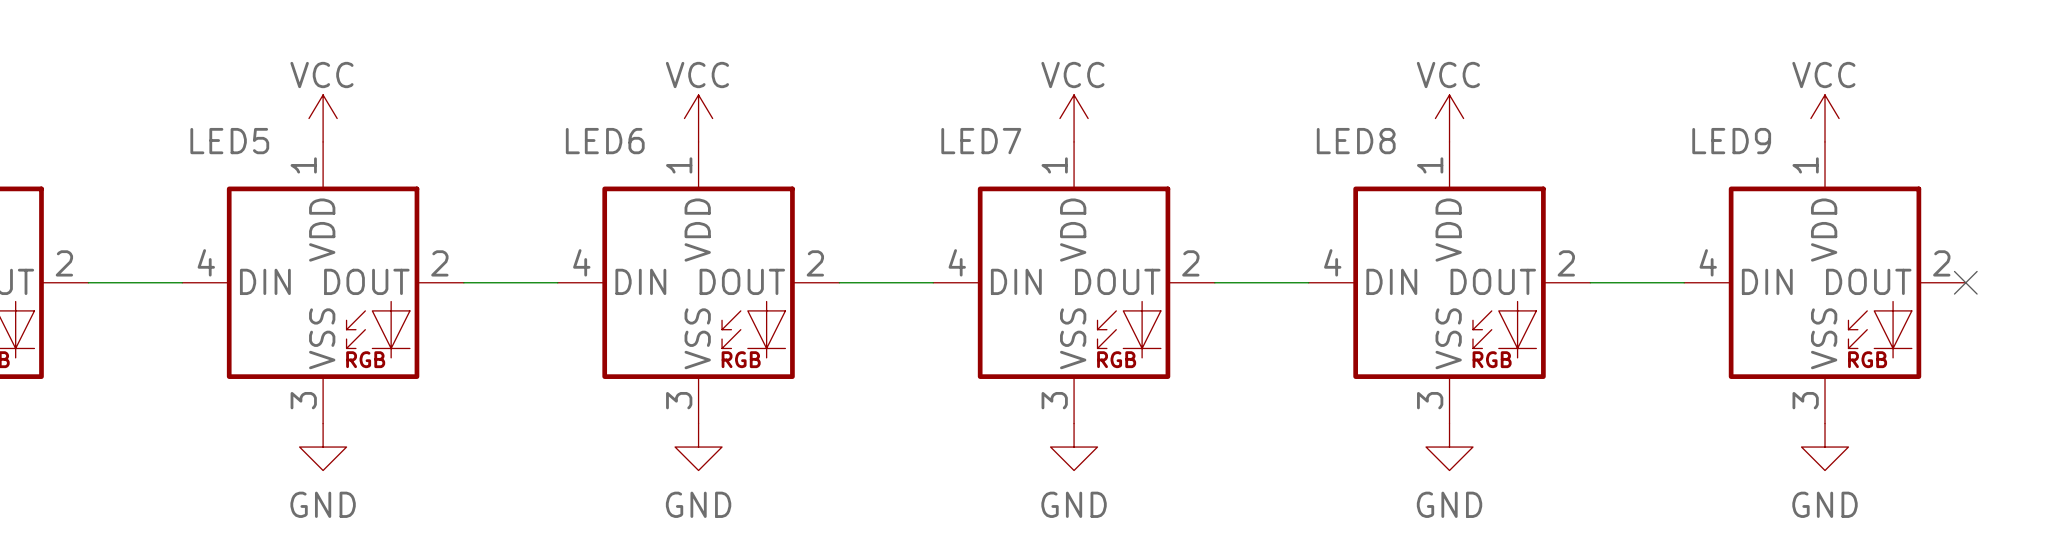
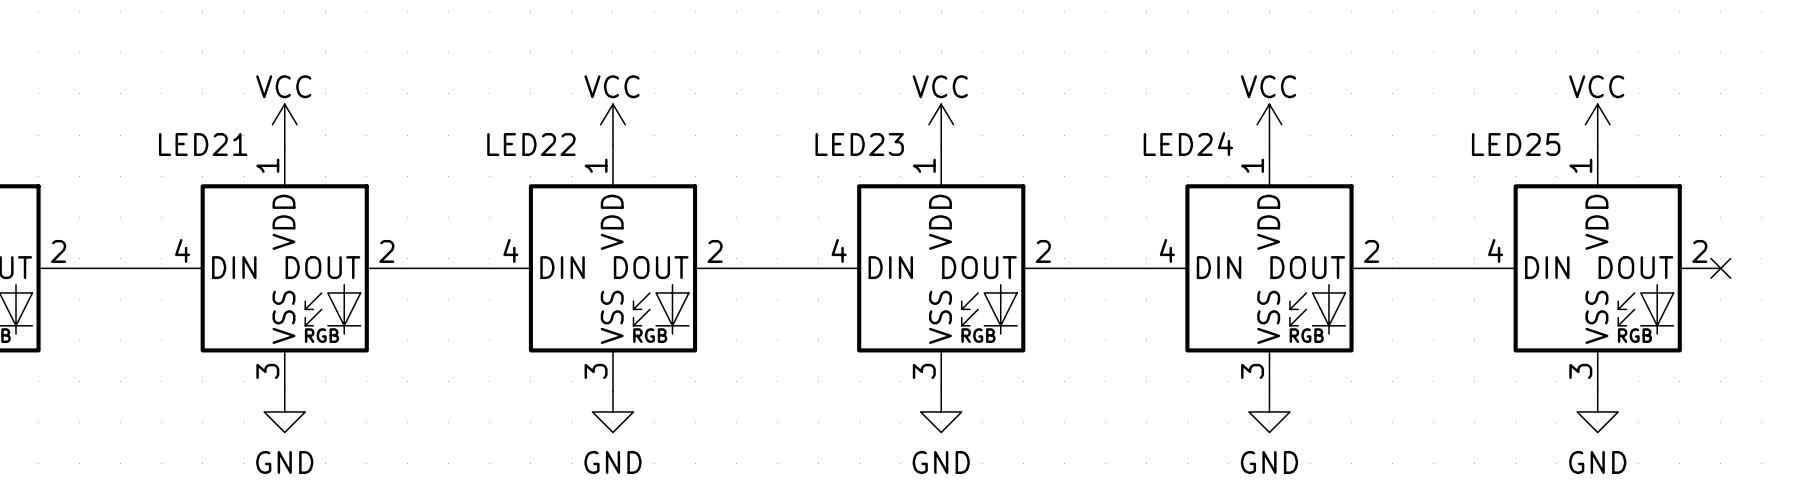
LED5 name: LED5 (229, 141) -> LED21 (203, 144)
LED6 name: LED6 (605, 141) -> LED22 (531, 144)
LED7 name: LED7 (981, 141) -> LED23 (859, 144)
LED8 name: LED8 (1356, 141) -> LED24 (1188, 144)
LED9 name: LED9 (1731, 141) -> LED25 (1516, 144)

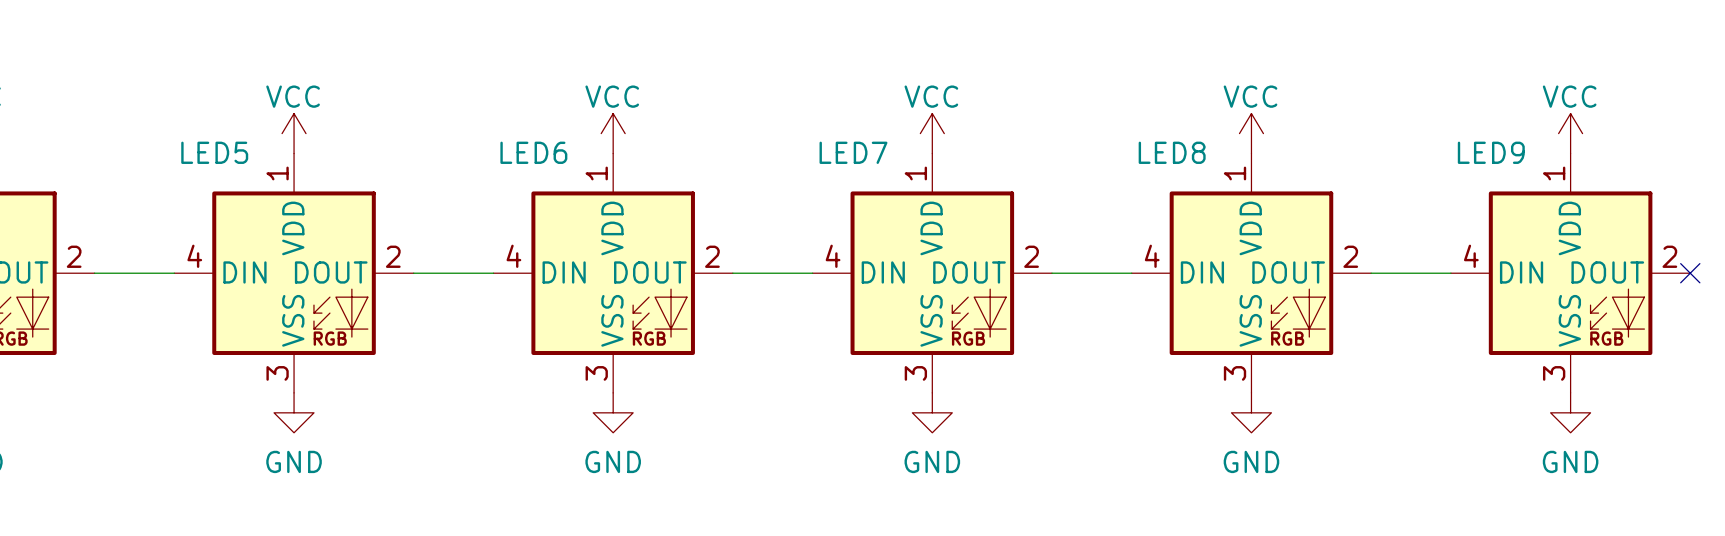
LED21 name: LED21 (203, 144) -> LED5 (214, 152)
LED22 name: LED22 (531, 144) -> LED6 (533, 152)
LED23 name: LED23 (859, 144) -> LED7 (853, 152)
LED24 name: LED24 (1188, 144) -> LED8 (1172, 152)
LED25 name: LED25 (1516, 144) -> LED9 (1491, 152)

